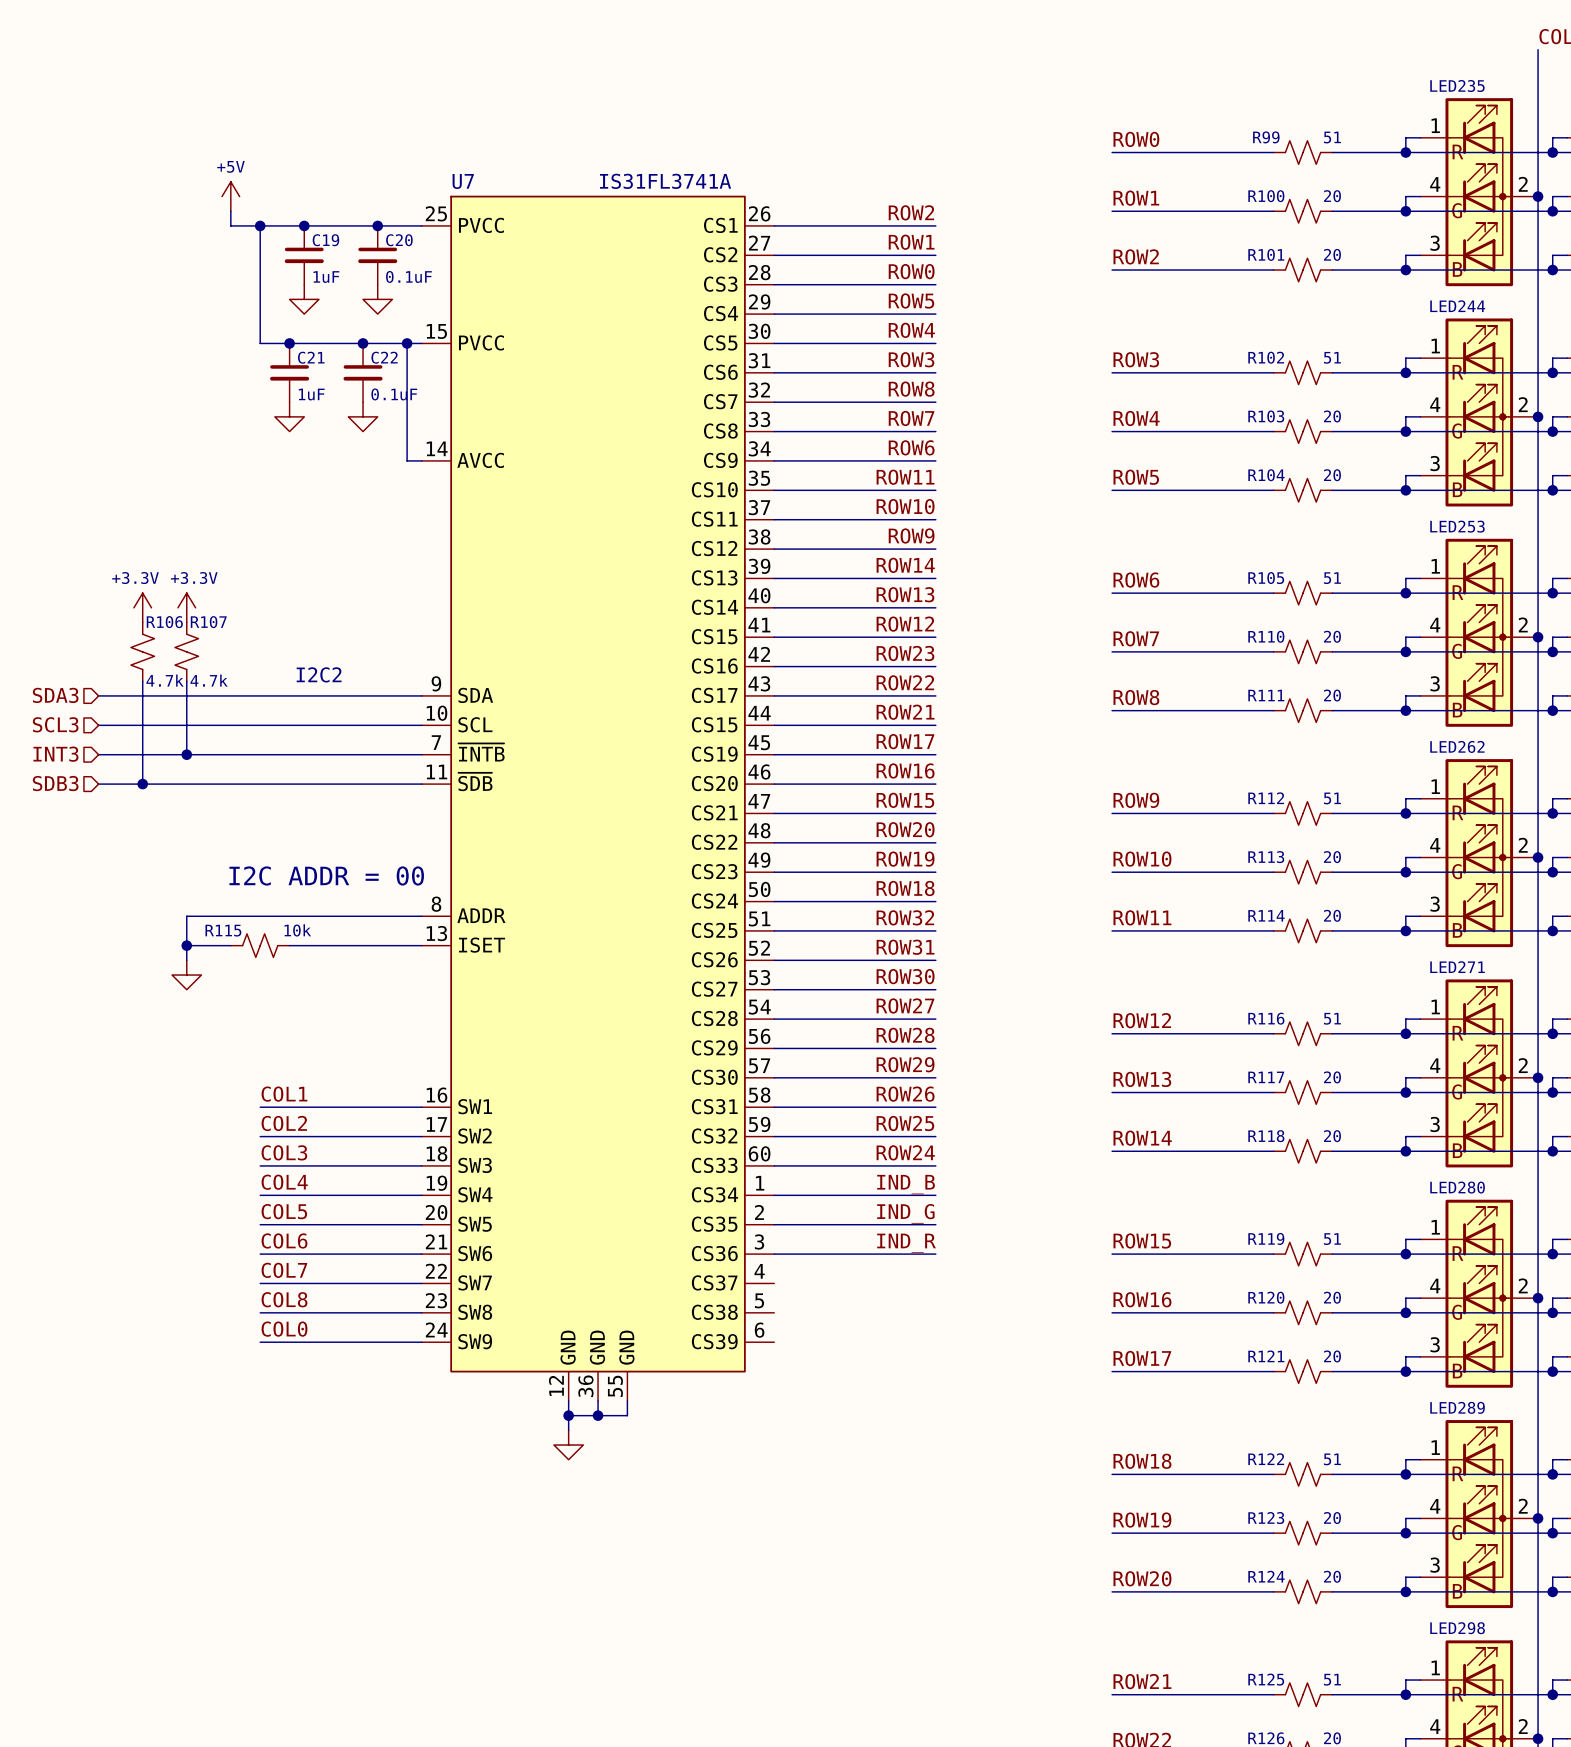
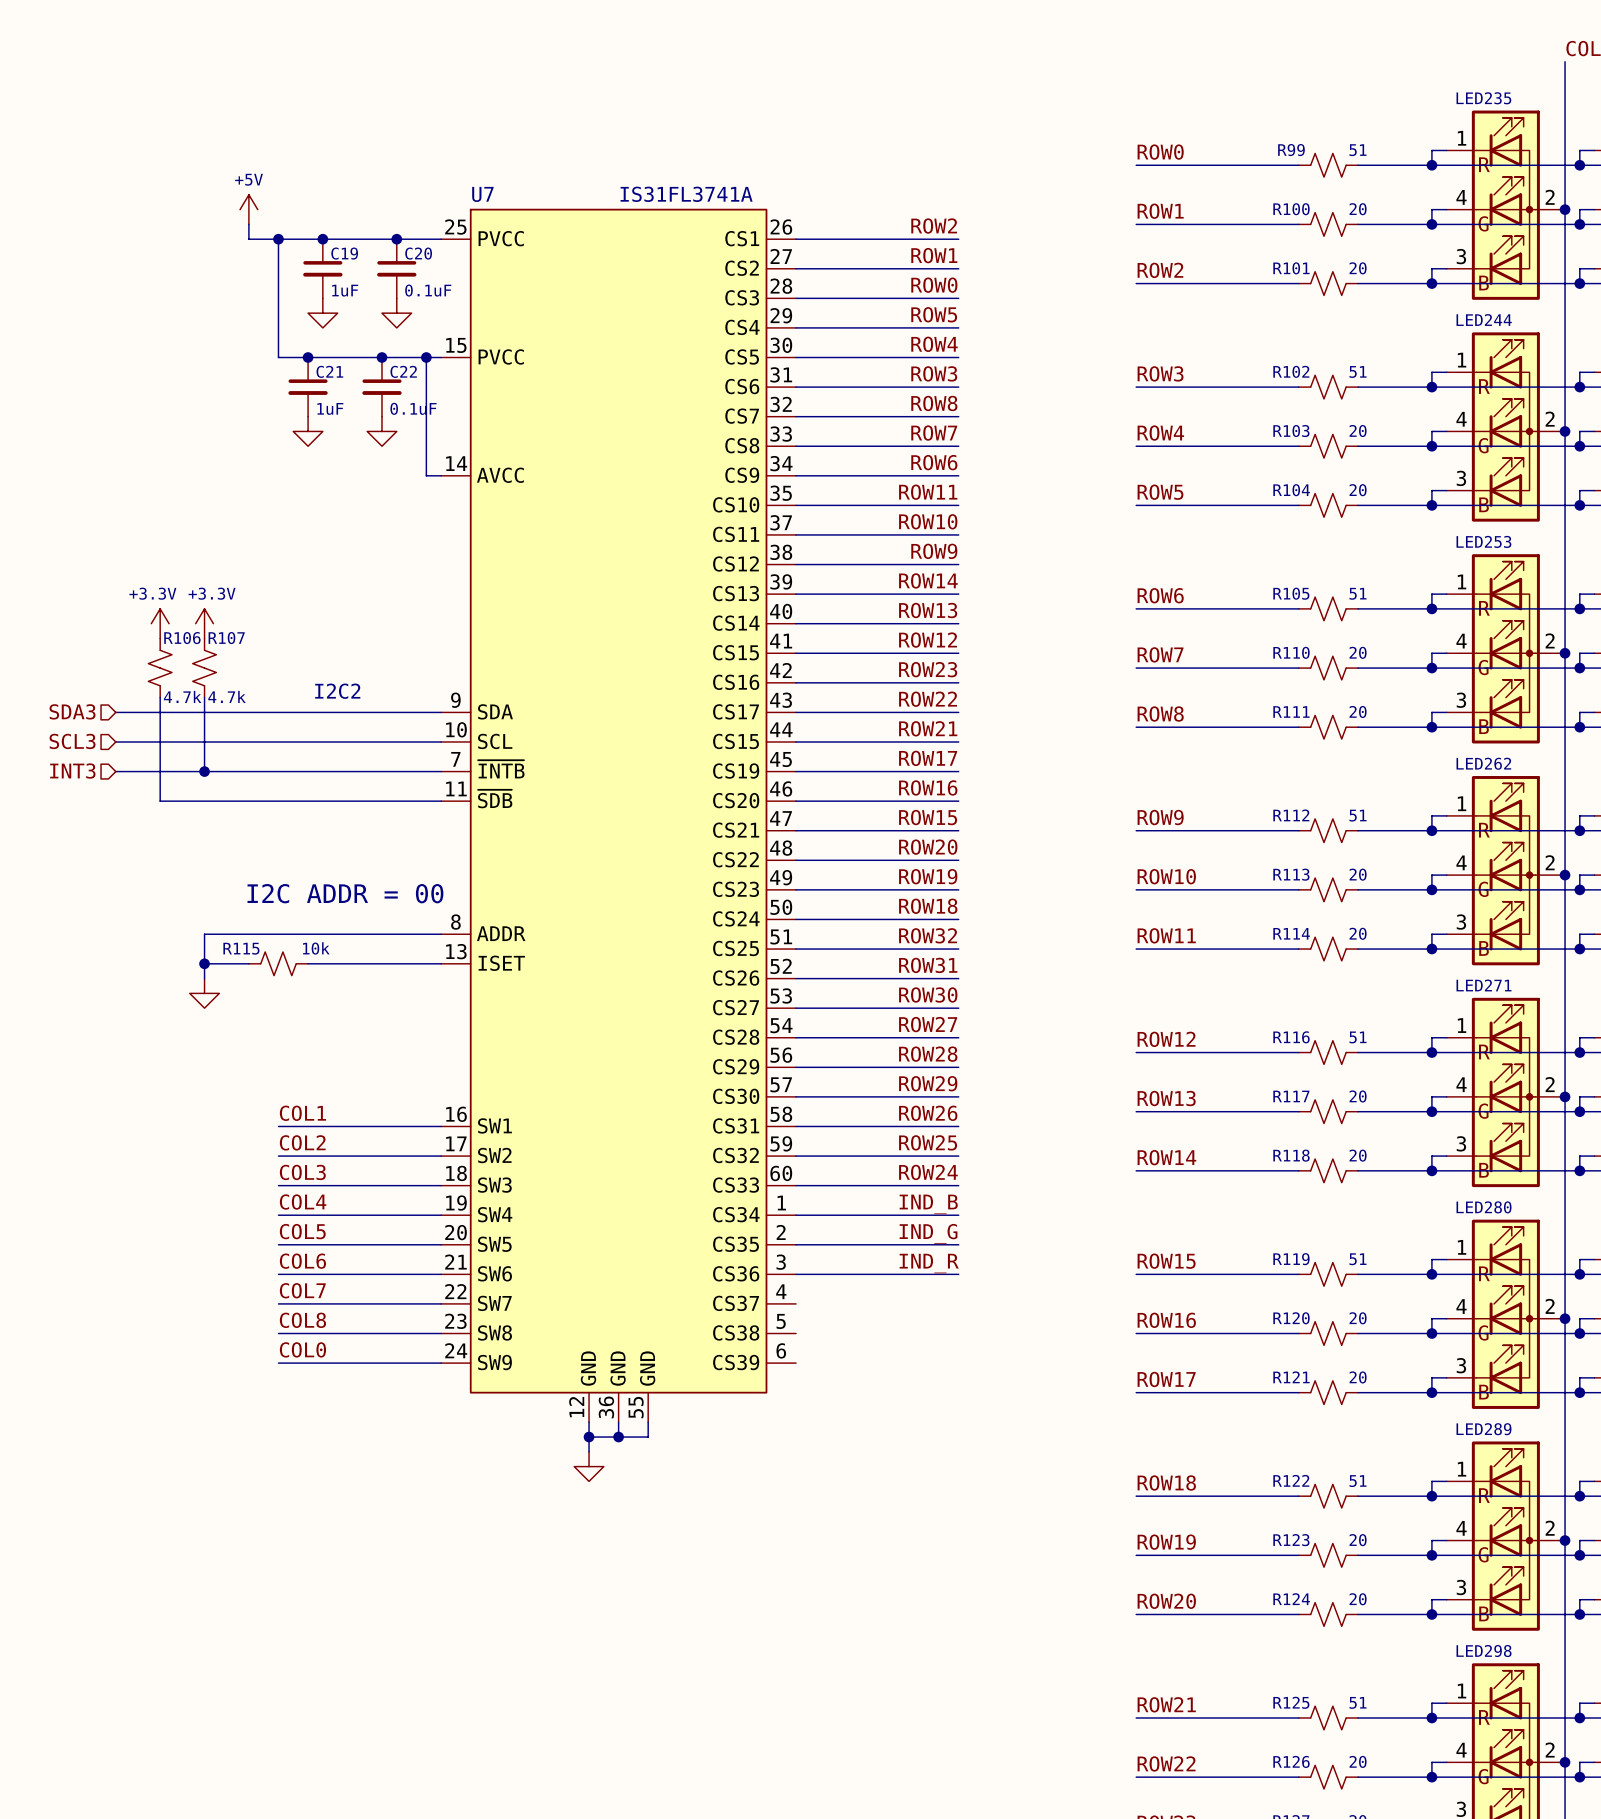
hierarchical label: SDB3 (55, 783) -> none
wire: (98, 784) (142, 784) -> none
junction: (142, 784) -> none

